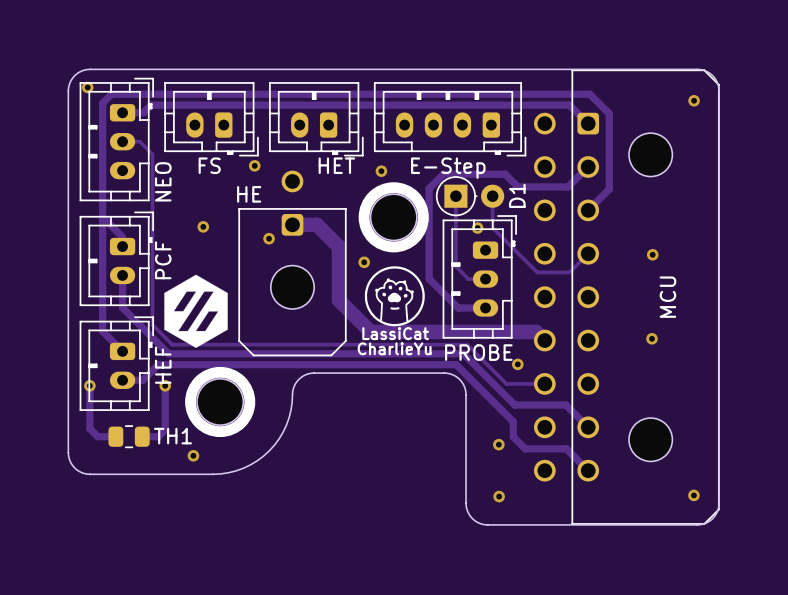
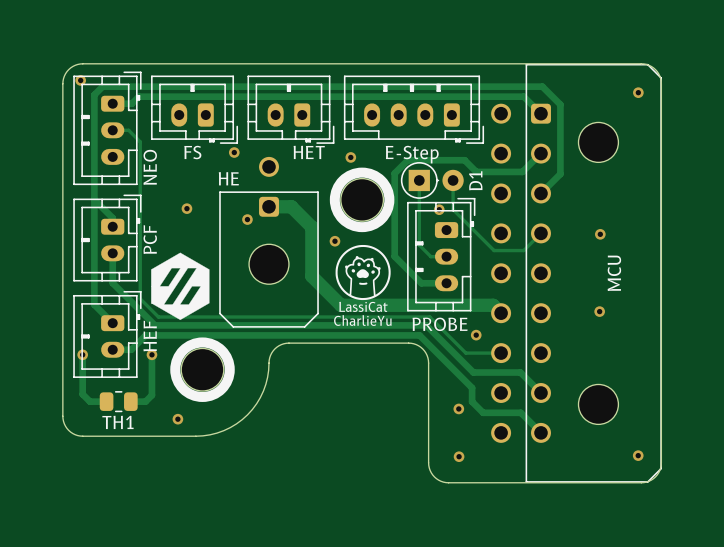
TH1 name position: TH1 (172, 436) -> TH1 (117, 422)

